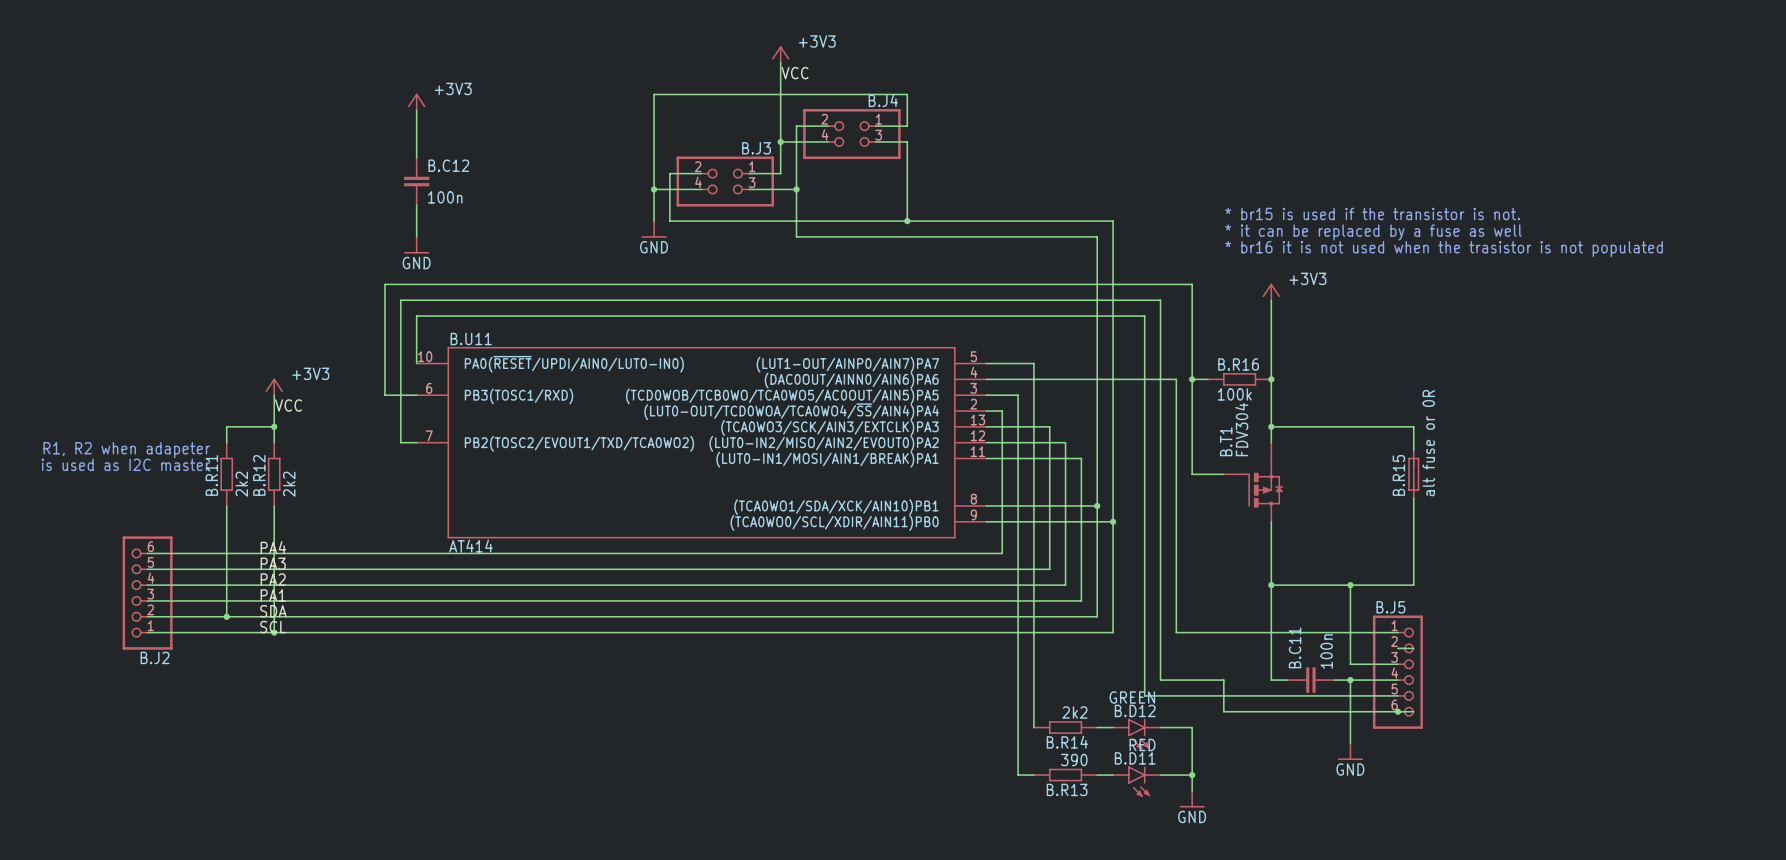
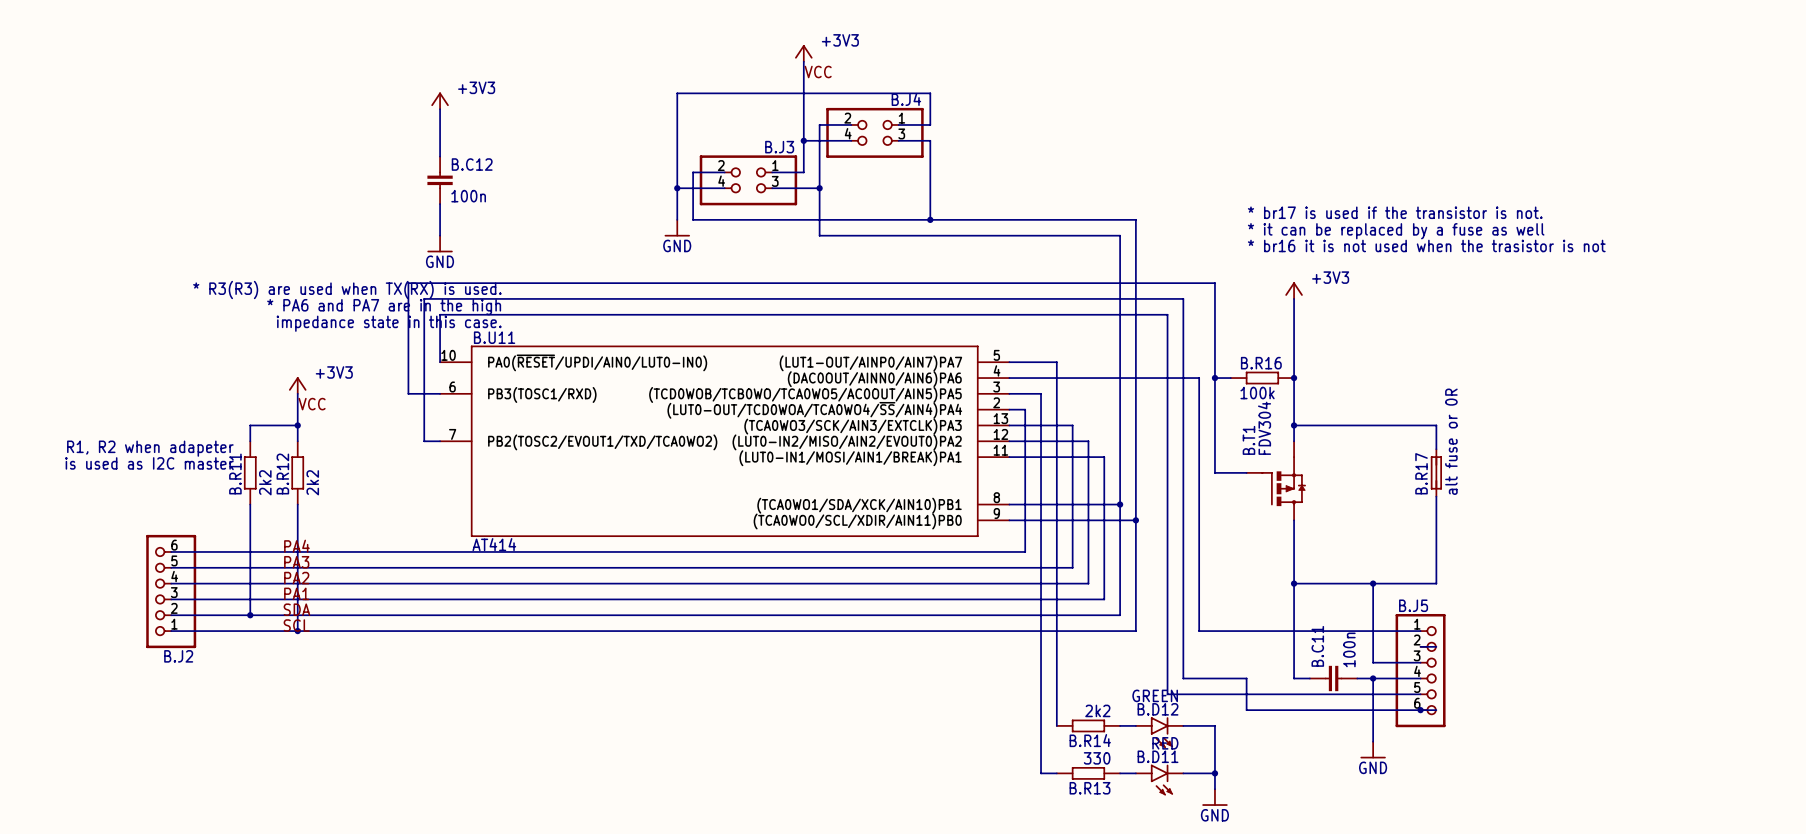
text: * br15 is used if the transistor is not. (1372, 213) -> * br17 is used if the transistor is not. (1395, 212)
text: * br16 it is not used when the trasistor is not populated (1444, 249) -> * br16 it is not used when the trasistor is not (1426, 245)
text: none -> * R3(R3) are used when TX(RX) is used. (347, 289)
text: none -> * PA6 and PA7 are in the high (384, 307)
text: none -> impedance state in this case. (389, 323)
B.R15 name: B.R15 (1398, 475) -> B.R17 (1421, 473)
B.R13 value: 390 (1074, 760) -> 330 (1097, 758)

